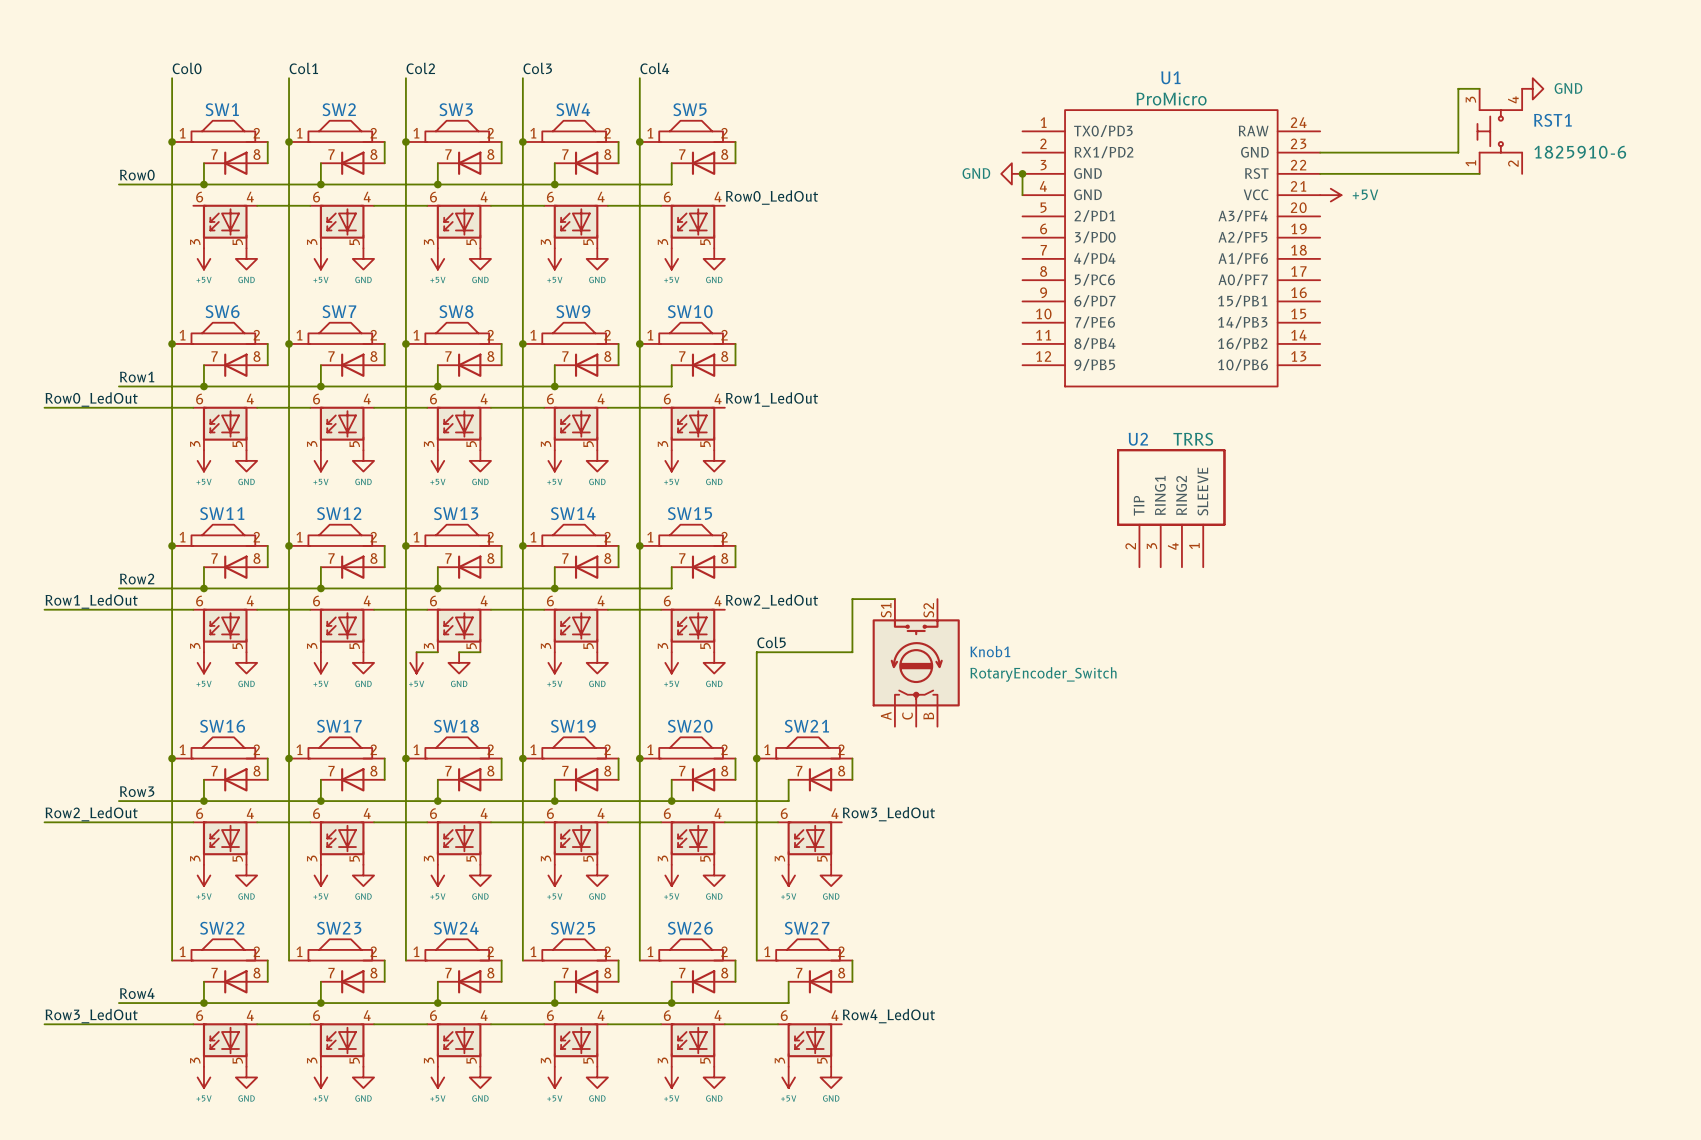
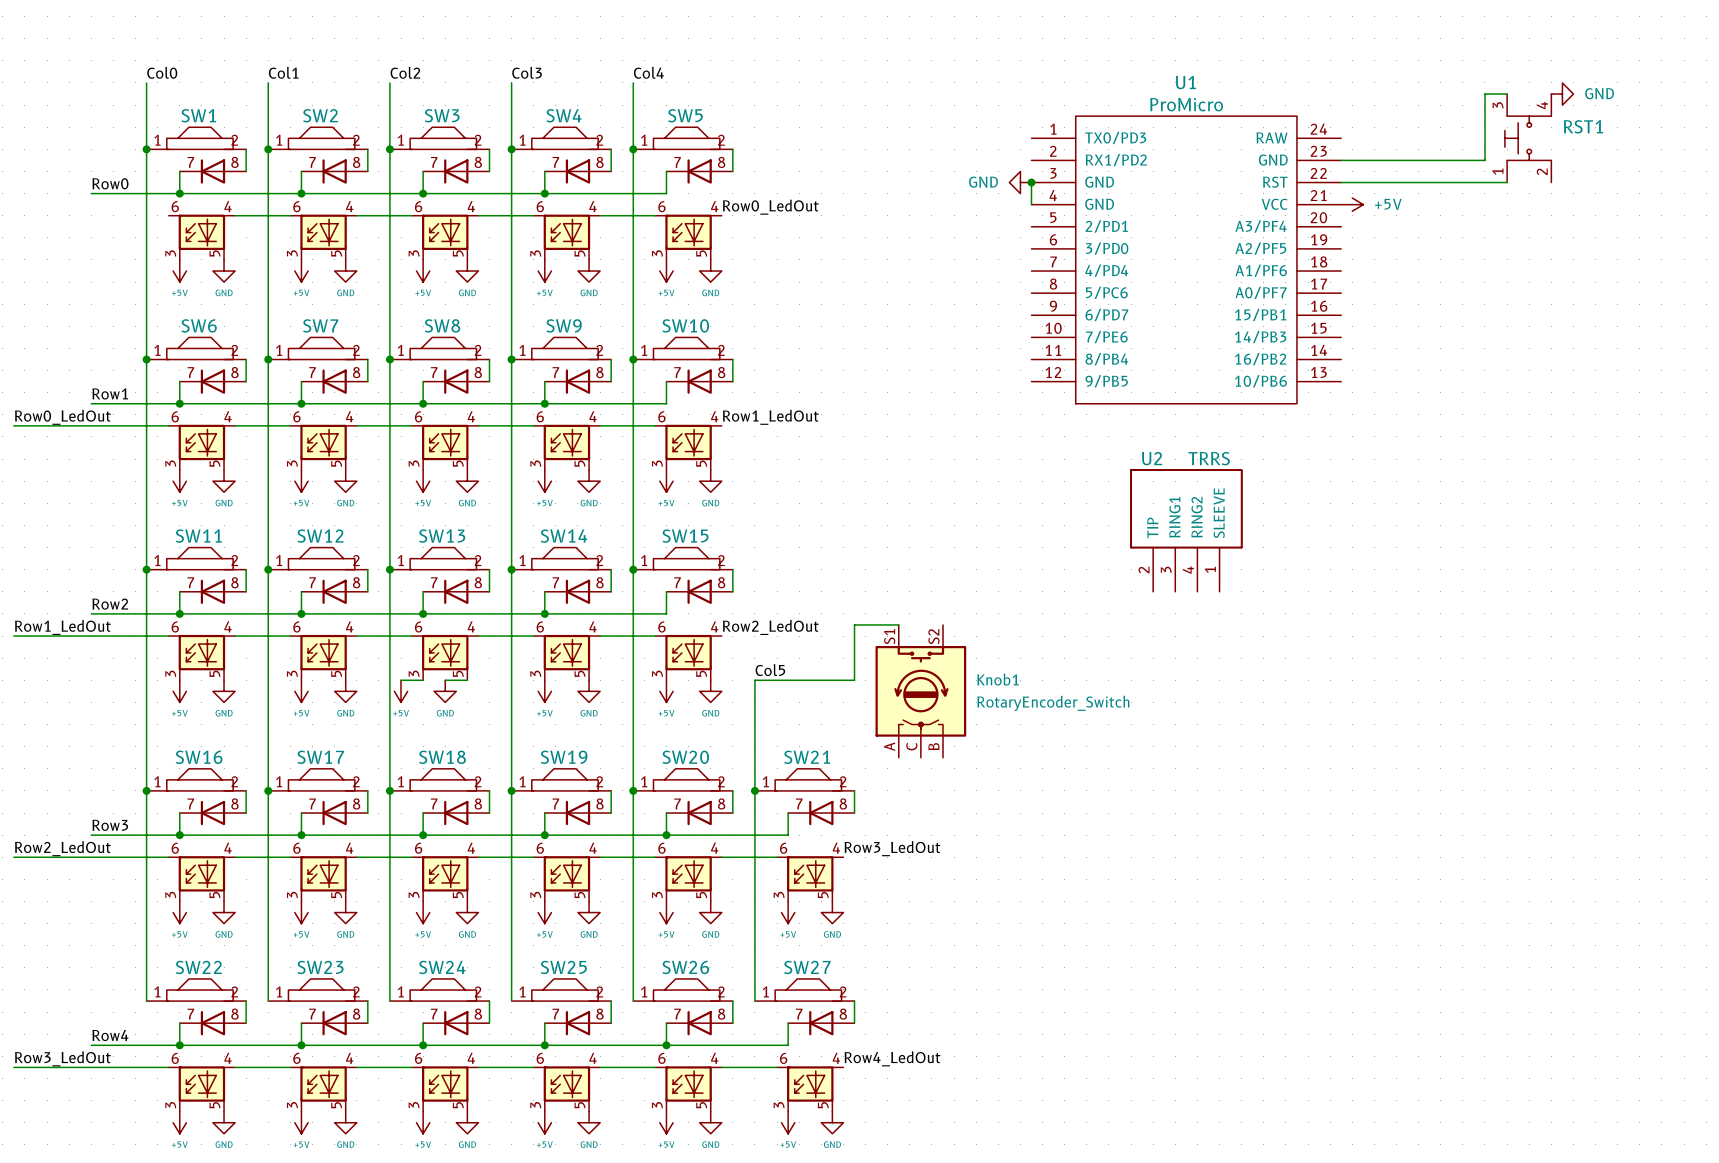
RST1 value: 1825910-6 (1580, 152) -> none

